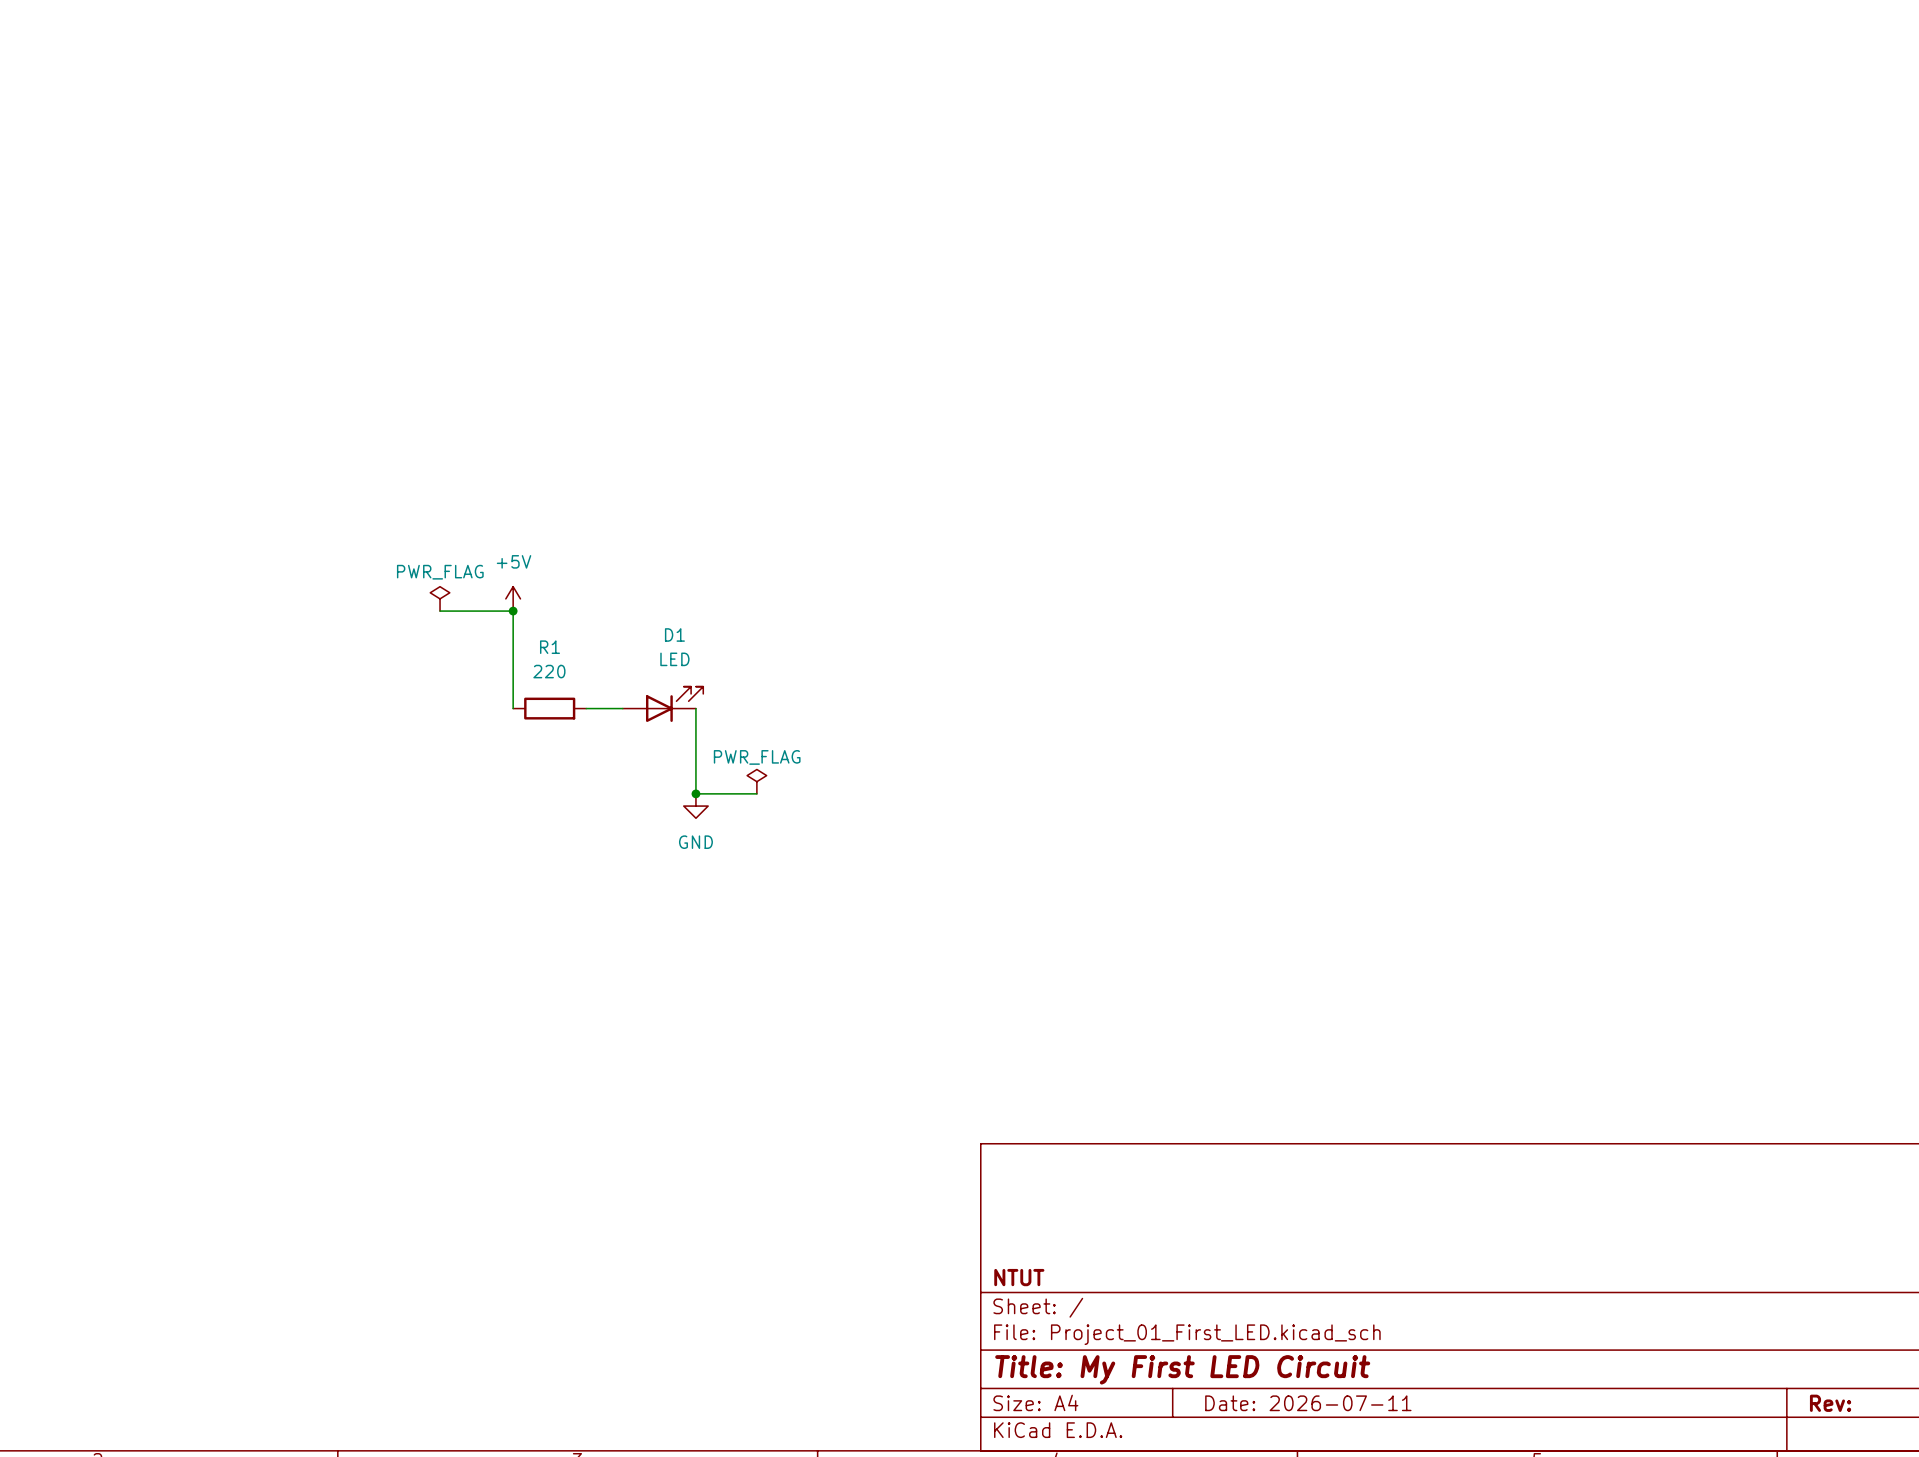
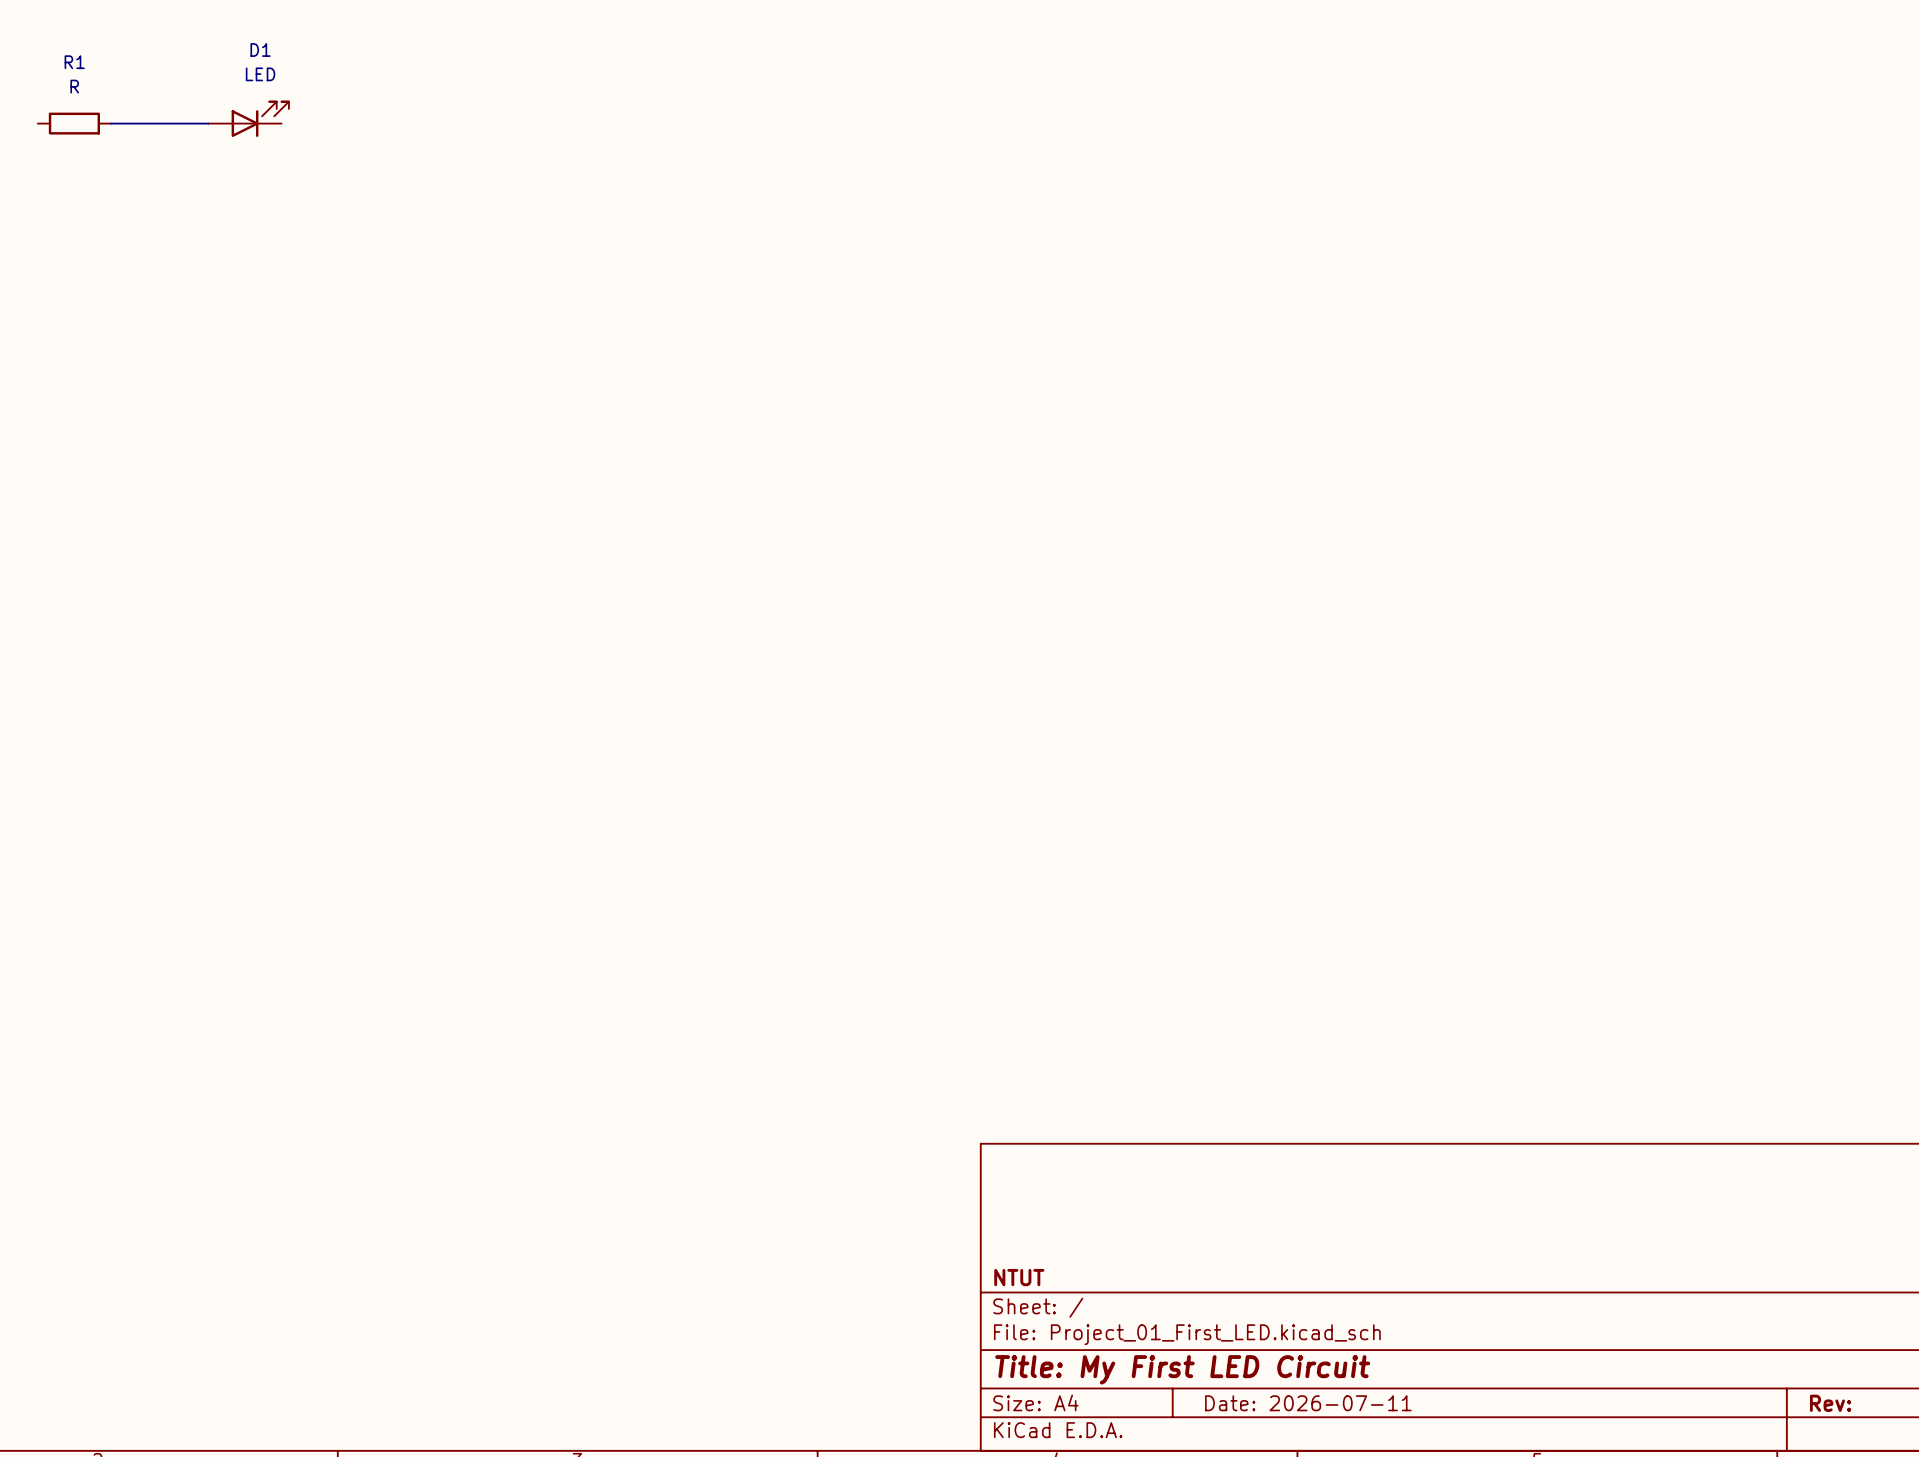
wire: none -> (110, 123) (208, 123)
power symbol: PWR_FLAG (440, 598) -> none
power symbol: +5V (513, 598) -> none
wire: (440, 611) (513, 611) (513, 708) -> none
junction: (513, 611) -> none
R1 value: 220 (549, 671) -> R (74, 86)
D1 position: (663, 704) -> (248, 119)
R1 position: (549, 708) -> (74, 123)
wire: (586, 708) (622, 708) -> none
wire: (695, 708) (695, 793) (756, 793) -> none
power symbol: PWR_FLAG (756, 781) -> none
junction: (695, 793) -> none
power symbol: GND (695, 806) -> none

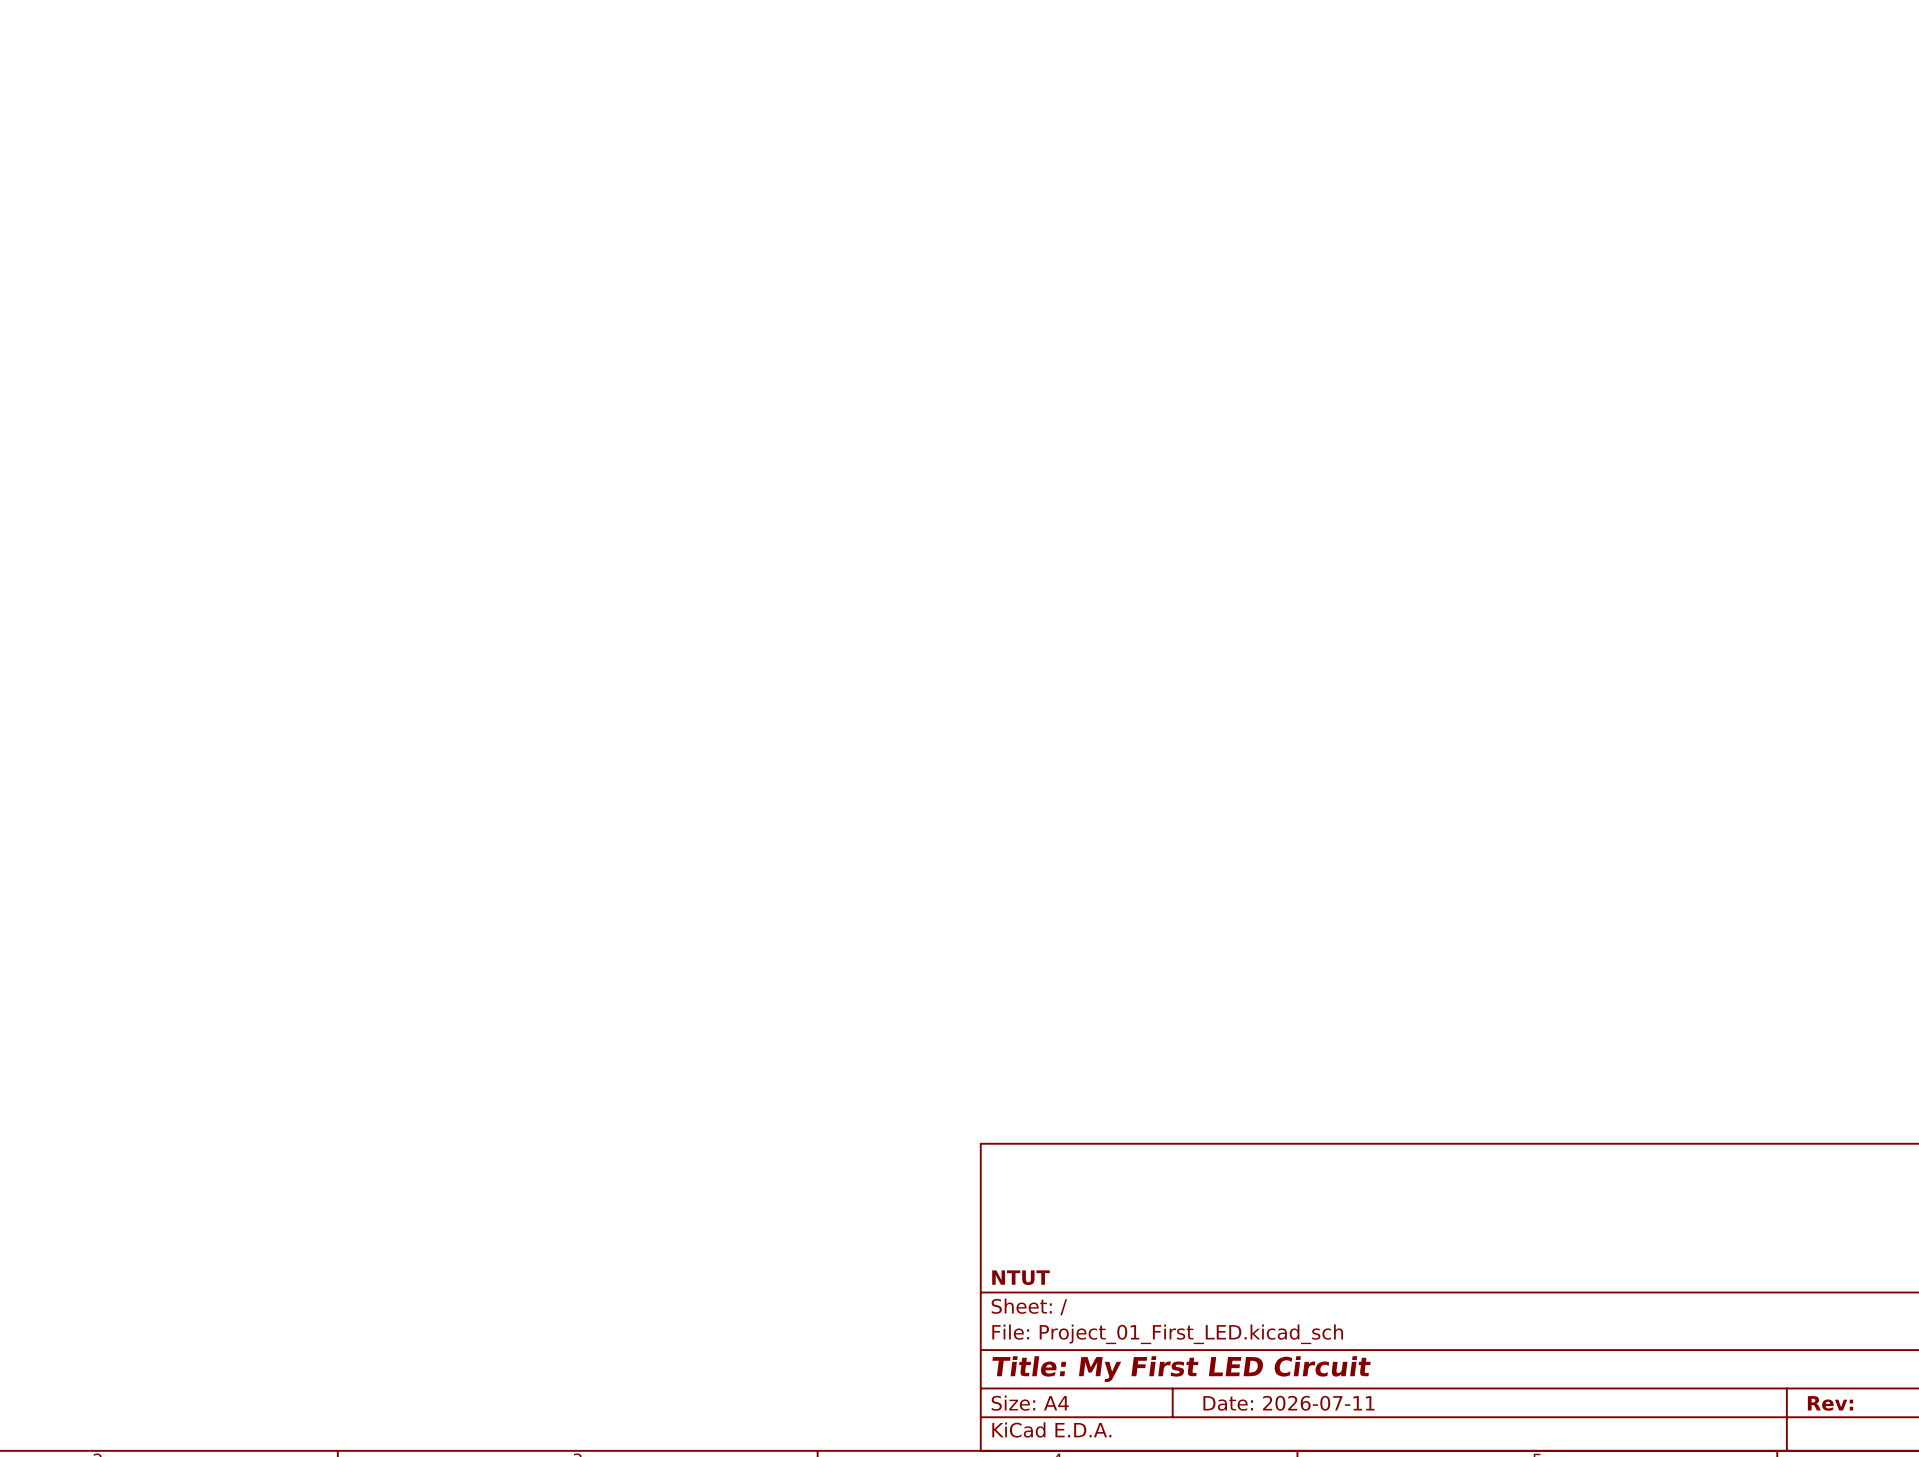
D1: LED (248, 119) -> none
R1: R (74, 123) -> none
wire: (110, 123) (208, 123) -> none

